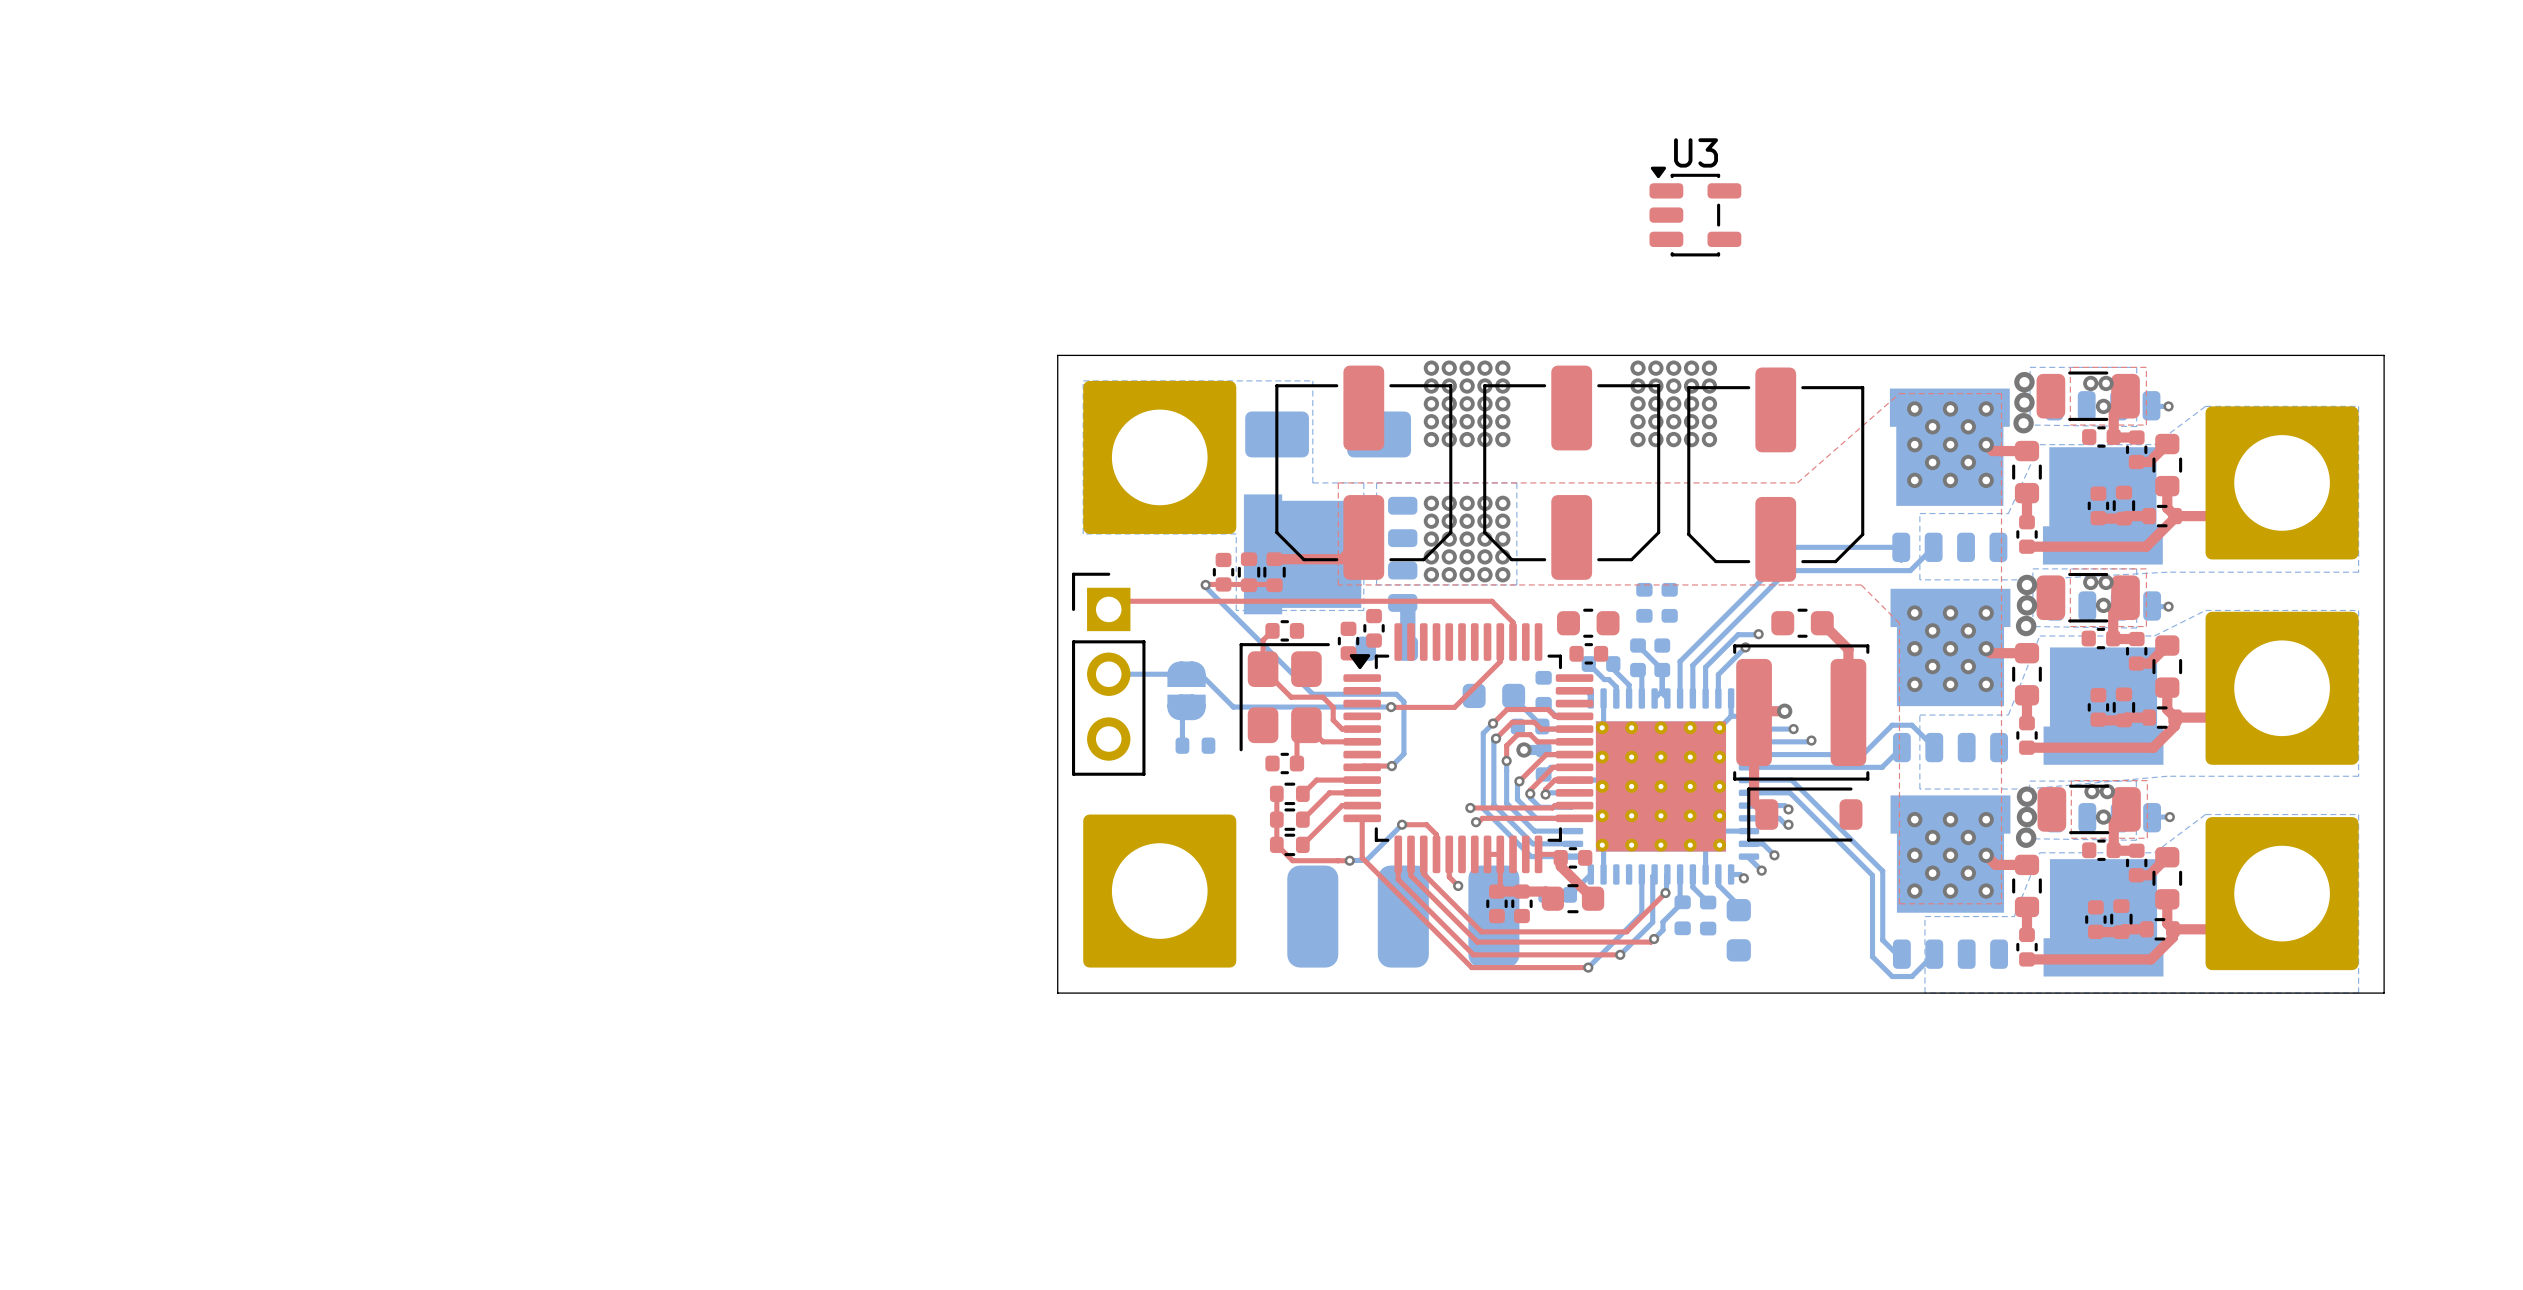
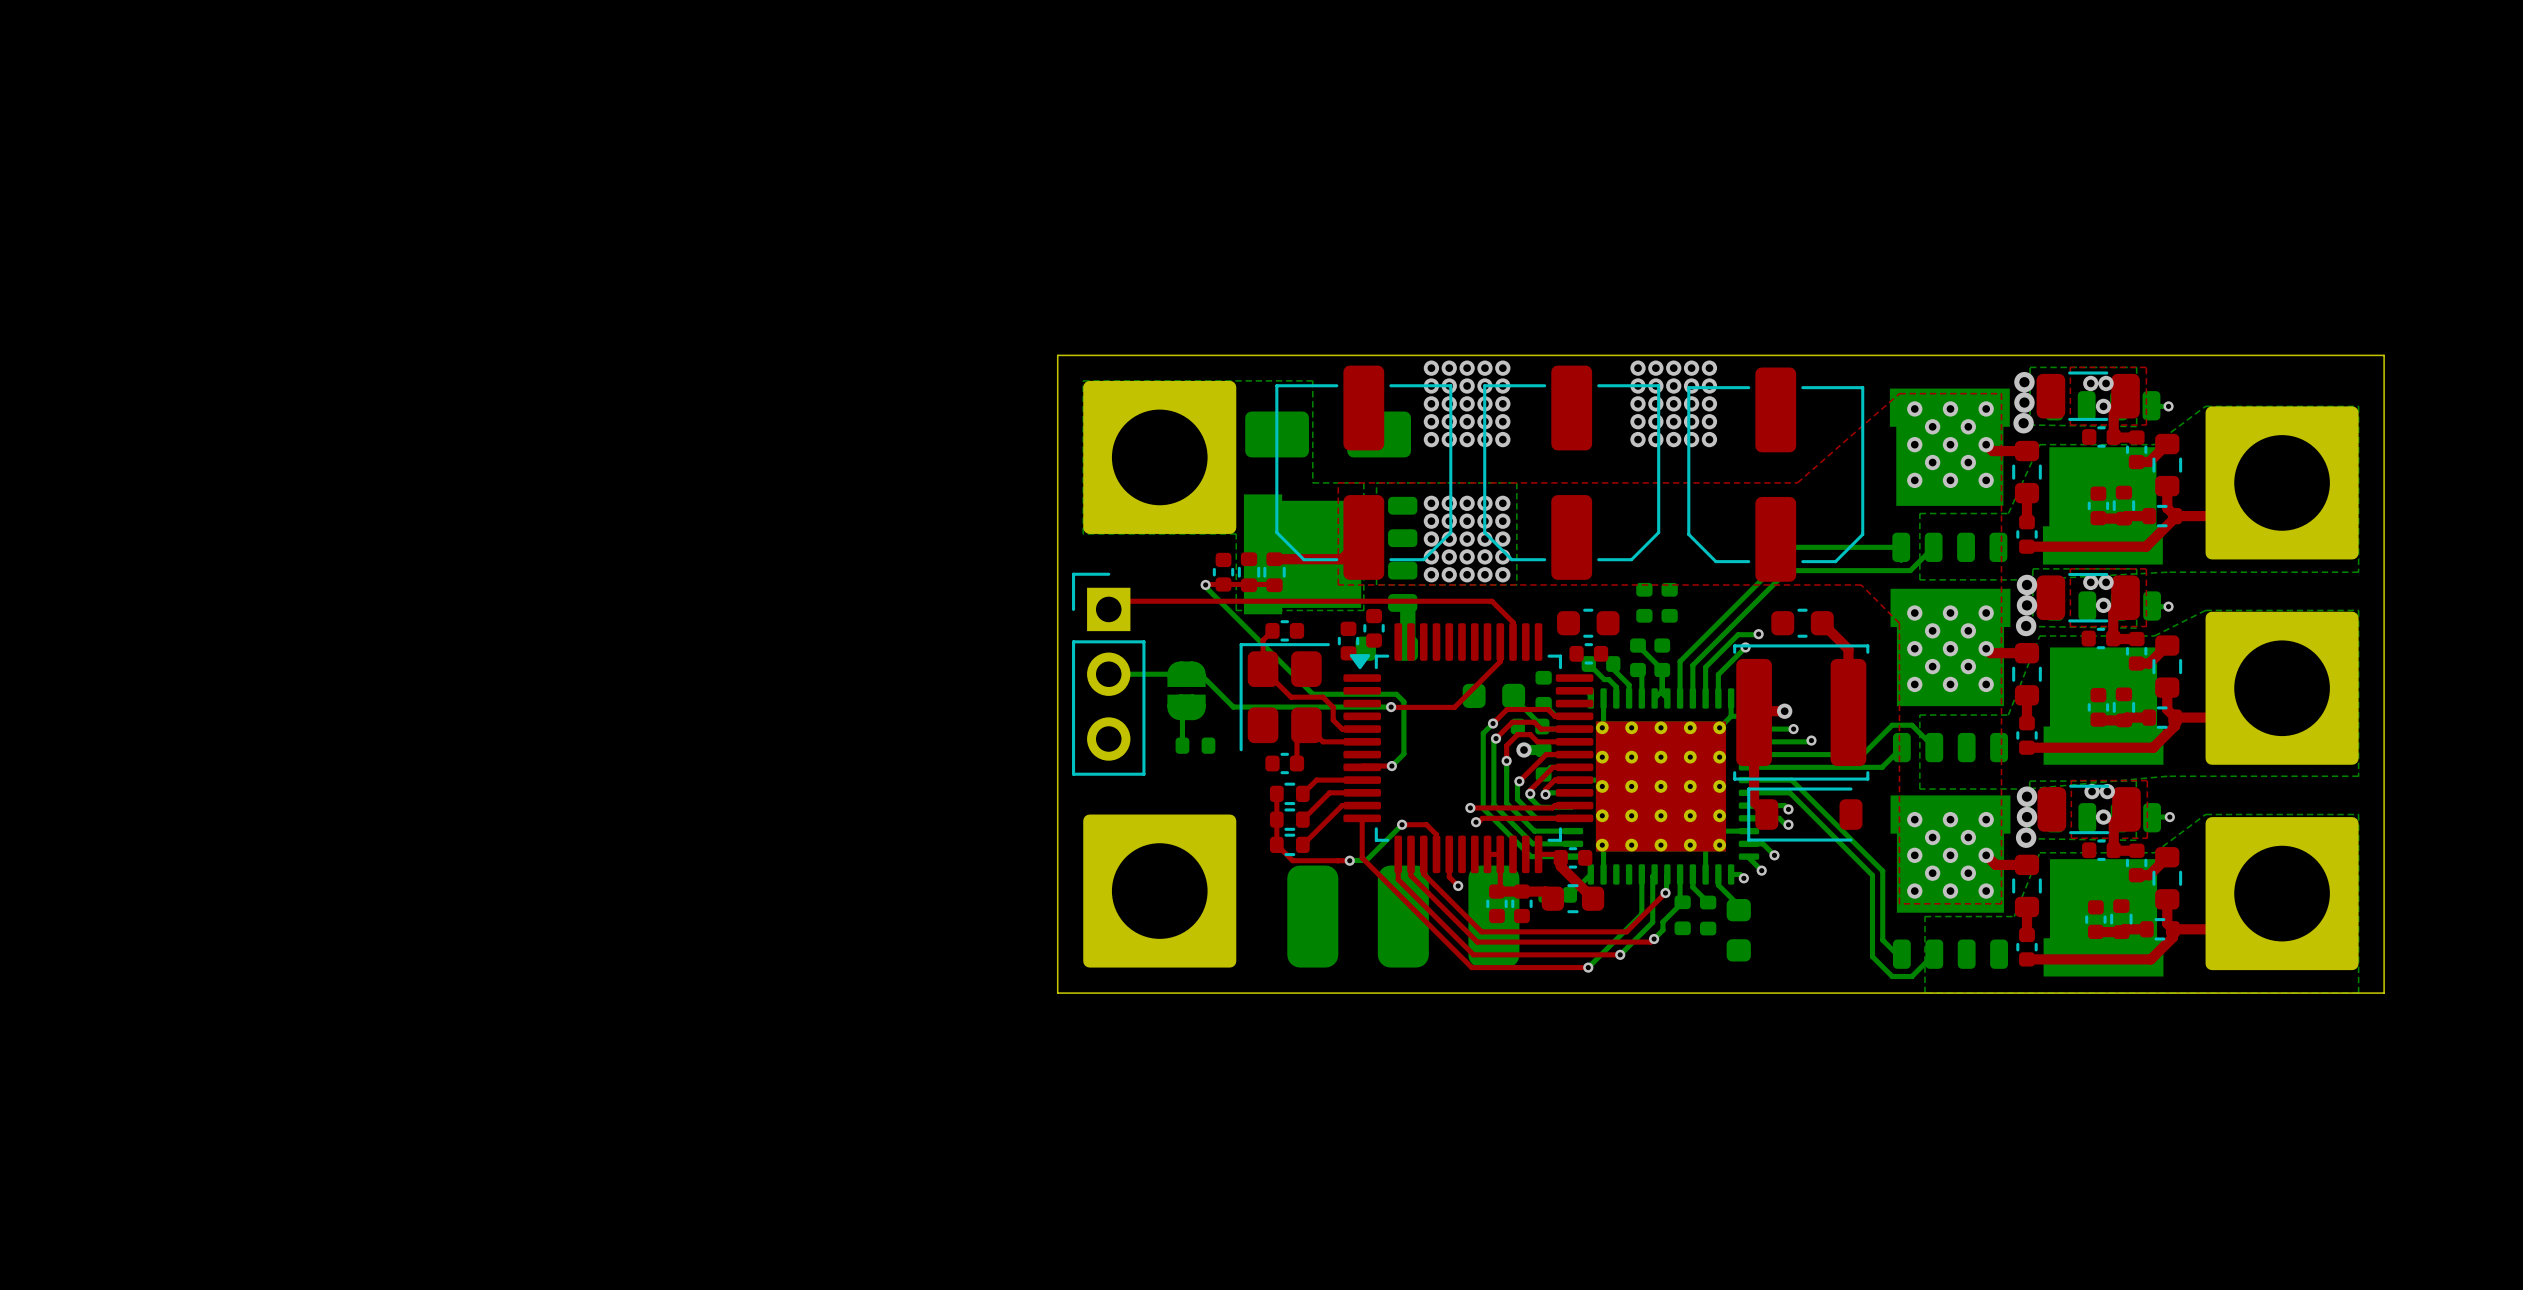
U3: (1695, 211) -> none

